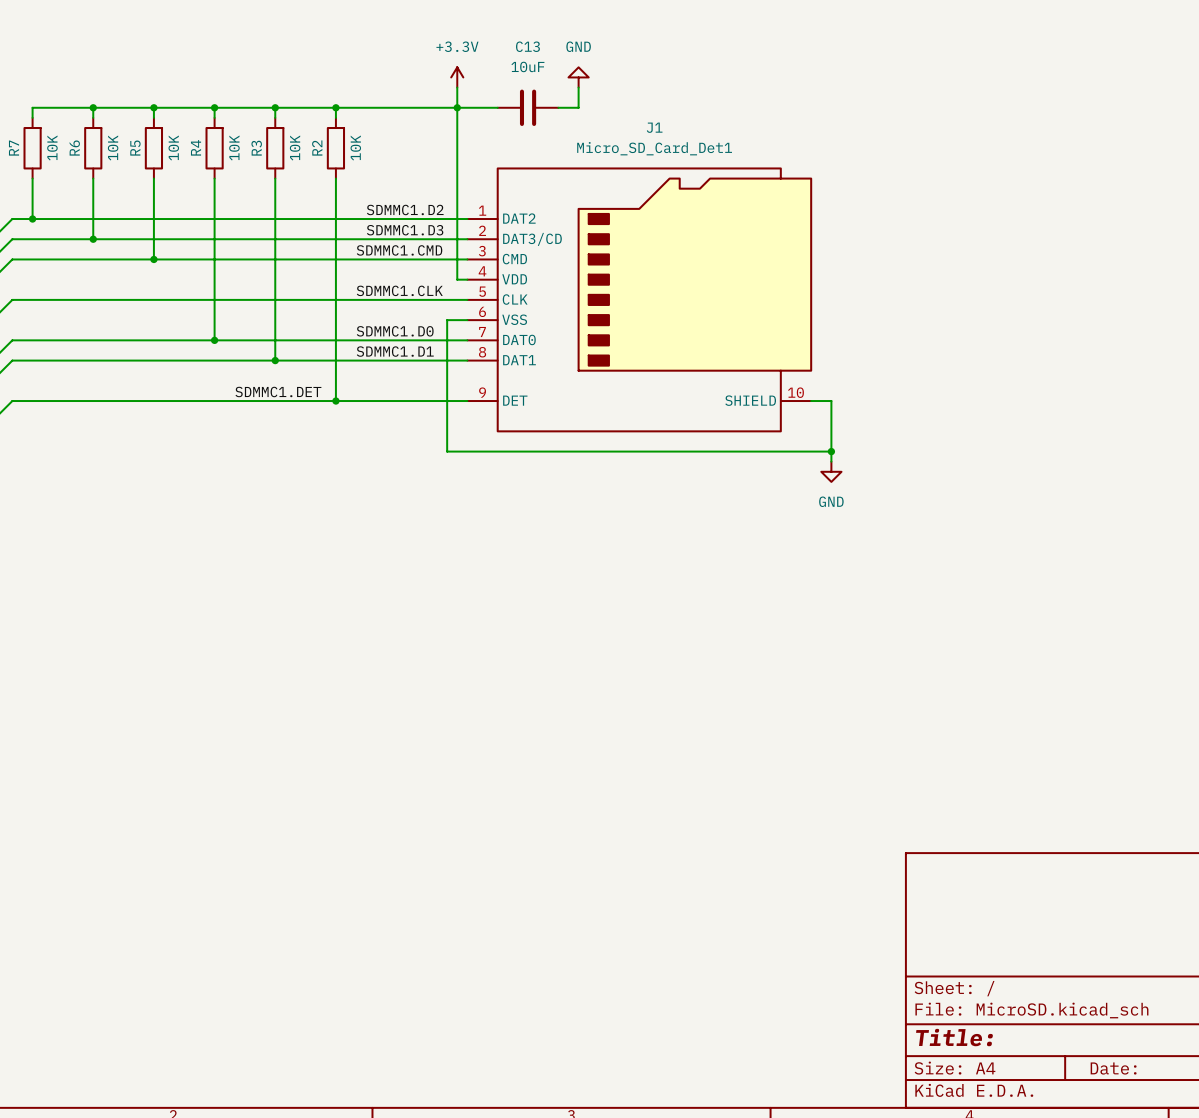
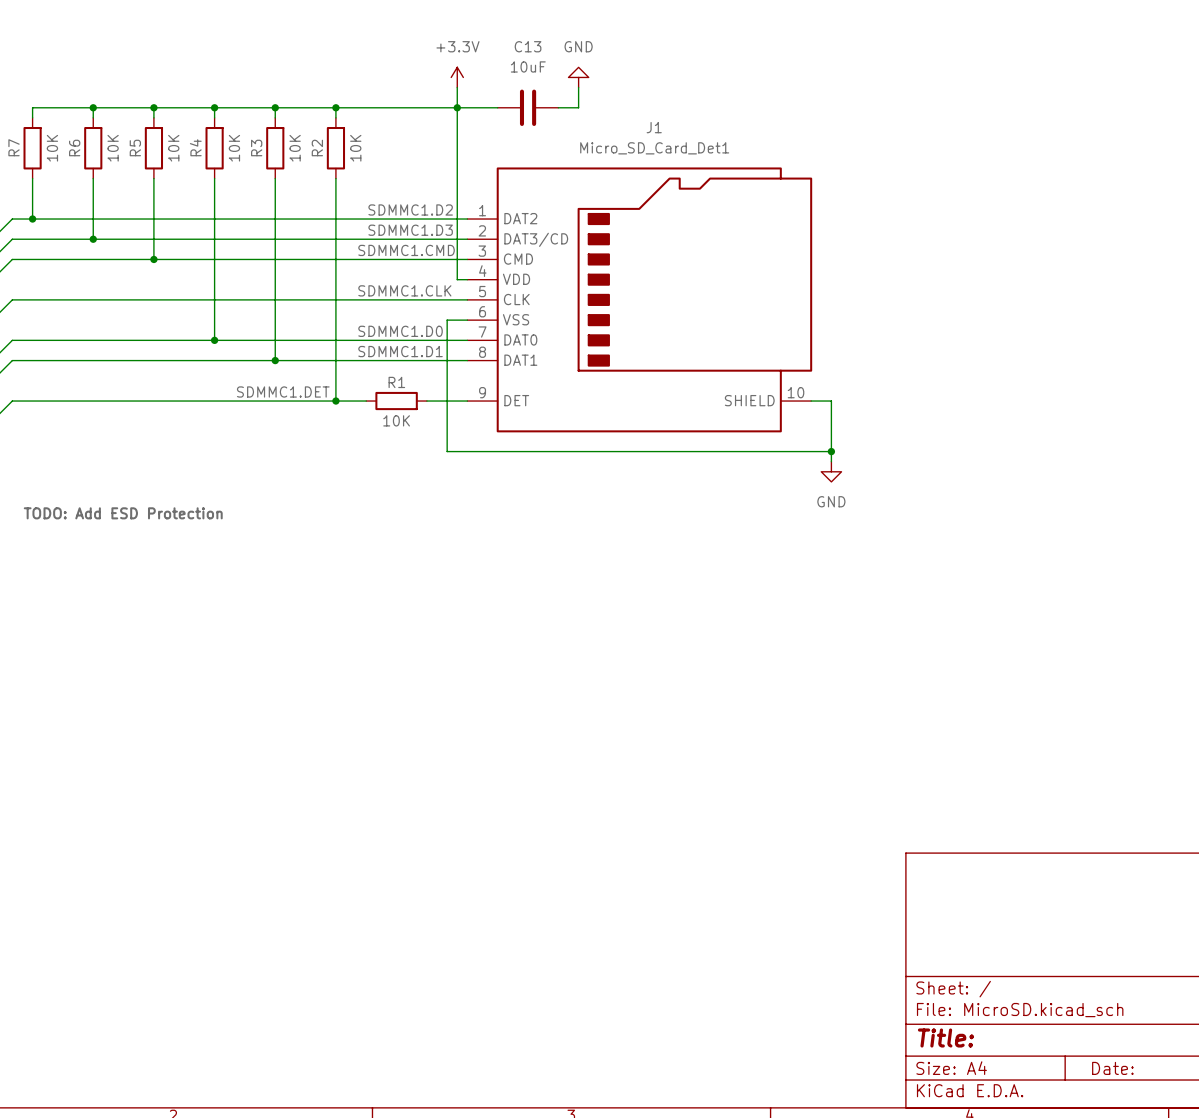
wire: (366, 401) (426, 401) -> none
R1: none -> 10K (396, 401)
label: none -> TODO: Add ESD Protection (123, 513)

